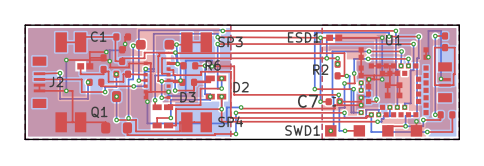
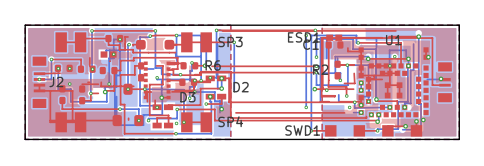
top track: none -> (92, 30) (155, 30)
bottom track: none -> (92, 30) (92, 72)
via: none -> (92, 30)
bottom track: none -> (155, 30) (155, 68) (161, 68) (161, 74) (180, 74)
via: none -> (155, 30)
top track: none -> (216, 30) (315, 30)
bottom track: (216, 30) (138, 30) (138, 80) -> (216, 30) (216, 77) (210, 77)
via: none -> (216, 30)
via: (222, 30) -> none
via: none -> (315, 30)
bottom track: (395, 30) (397, 107) -> none
via: (395, 30) -> none
top track: none -> (176, 35) (150, 36)
via: none -> (176, 35)
bottom track: none -> (306, 35) (306, 107)
via: none -> (306, 35)
top track: (445, 35) (435, 36) -> none
top track: (115, 36) (115, 61) (122, 61) (122, 58) (144, 58) (144, 52) -> (125, 49) (133, 49) (133, 52) (144, 52)
top track: (116, 36) (80, 36) (80, 38) -> (122, 49) (119, 49) (119, 45) (108, 45) (108, 38) (80, 38)
C1 position: (122, 36) -> (334, 44)
via: none -> (150, 36)
bottom track: (389, 36) (389, 32) (314, 32) (314, 89) -> none
via: (389, 36) -> none
bottom track: (435, 36) (435, 114) -> none
via: (435, 36) -> none
bottom track: none -> (150, 37) (140, 37) (140, 105) (157, 105) (157, 107)
top track: (217, 37) (322, 37) -> (321, 88) (322, 37)
bottom track: (217, 37) (217, 33) (153, 33) (153, 71) (144, 71) (144, 86) (133, 86) -> none
via: (217, 37) -> none
via: (320, 37) -> none
bottom track: (382, 37) (382, 79) -> none
via: (382, 37) -> none
part: none -> (114, 38)
via: none -> (120, 39)
part: (445, 41) -> none
top track: none -> (206, 42) (234, 42)
bottom track: none -> (234, 42) (234, 90)
via: none -> (234, 42)
top track: none -> (358, 42) (401, 42) (401, 65)
bottom track: none -> (358, 42) (356, 42) (356, 35) (311, 35) (311, 130)
via: none -> (358, 42)
via: (125, 44) -> none
bottom track: none -> (129, 44) (128, 89)
via: none -> (129, 44)
bottom track: (176, 44) (177, 64) (180, 64) (180, 80) -> none
via: (176, 44) -> none
top track: (217, 44) (413, 44) -> none
via: (217, 44) -> none
top track: none -> (328, 44) (328, 86) (346, 86) (346, 95)
via: (413, 44) -> none
bottom track: (133, 45) (133, 79) (128, 79) (128, 118) -> none
via: (133, 45) -> none
top track: none -> (347, 48) (347, 51) (360, 51)
top track: (369, 51) (401, 51) -> none
bottom track: (369, 51) (332, 51) (333, 130) (330, 130) -> none
via: (369, 51) -> none
bottom track: (401, 51) (401, 65) -> none
via: (401, 51) -> none
top track: (106, 52) (89, 52) (89, 57) (103, 57) -> none
via: (106, 52) -> none
via: (175, 52) -> none
part: none -> (108, 54)
via: none -> (113, 54)
part: (122, 55) -> none
bottom track: none -> (201, 56) (176, 56) (176, 35) (201, 35) (201, 80)
bottom track: none -> (368, 56) (335, 56) (335, 73)
via: none -> (394, 56)
bottom track: none -> (316, 57) (316, 38) (353, 38) (353, 49) (375, 49) (375, 100)
via: none -> (316, 57)
bottom track: none -> (406, 57) (406, 50) (389, 50) (389, 65)
bottom track: (428, 57) (428, 30) (441, 30) (441, 78) -> none
via: (326, 58) -> none
top track: (337, 58) (161, 58) (161, 73) (168, 74) -> none
via: (337, 58) -> none
bottom track: (368, 58) (354, 58) (354, 73) -> none
bottom track: (418, 58) (417, 58) (417, 116) (405, 116) (405, 126) (423, 126) (423, 120) -> (418, 58) (421, 129) (402, 129)
top track: none -> (51, 59) (81, 59) (80, 69)
bottom track: none -> (51, 59) (51, 79) (39, 79)
via: none -> (51, 59)
top track: (66, 60) (110, 60) (110, 67) (129, 67) (129, 63) (150, 63) -> none
bottom track: (66, 60) (66, 90) -> none
via: (66, 60) -> none
via: (109, 61) -> none
bottom track: none -> (191, 62) (190, 80) (194, 80)
via: none -> (191, 62)
part footprint: [77, 63, 94, 70] -> [77, 65, 96, 73]
part: (103, 63) -> none
top track: (145, 63) (150, 63) (150, 92) -> none
via: (177, 64) -> none
via: (337, 64) -> none
top track: none -> (340, 64) (354, 65) (347, 65) (340, 64)
top track: none -> (141, 65) (134, 65) (134, 74) (120, 74) (120, 104) (124, 104) (124, 133) (175, 133)
bottom track: (205, 65) (205, 94) (210, 94) (210, 96) -> none
bottom track: none -> (347, 65) (368, 65) (368, 101)
bottom track: none -> (347, 65) (347, 85) (316, 85) (316, 72)
via: none -> (347, 65)
via: none -> (389, 65)
via: (401, 65) -> none
bottom track: none -> (407, 65) (407, 101) (398, 101) (398, 129) (377, 129) (377, 130)
top track: (80, 66) (80, 74) (103, 74) (103, 69) (103, 71) (108, 71) (108, 81) (123, 81) (123, 74) (145, 74) -> none
bottom track: (211, 66) (211, 60) (185, 60) (185, 96) (168, 96) (168, 91) -> none
via: (211, 66) -> none
top track: (234, 66) (234, 94) (338, 94) -> (234, 66) (316, 66)
bottom track: none -> (316, 66) (321, 66) (321, 73) (340, 73) (340, 80)
via: none -> (316, 66)
bottom track: none -> (58, 68) (58, 89) (70, 89) (70, 101) (106, 101) (106, 90)
via: none -> (58, 68)
part: none -> (63, 68)
via: none -> (69, 68)
via: (145, 68) -> none
top track: none -> (171, 68) (177, 69) (177, 57) (133, 57) (133, 60) (120, 60) (120, 70) (114, 70) (114, 90) (106, 90)
via: none -> (92, 69)
part: none -> (108, 70)
part: none -> (141, 71)
bottom track: none -> (92, 72) (90, 93)
top track: none -> (316, 72) (199, 72) (199, 74) (194, 74)
via: none -> (316, 72)
bottom track: (60, 73) (60, 98) (88, 98) (88, 82) -> none
via: (60, 73) -> none
via: (354, 73) -> none
via: (116, 74) -> none
part: (122, 74) -> none
via: none -> (180, 74)
top track: (346, 76) (337, 75) (344, 76) (344, 53) (159, 53) (158, 81) (182, 81) (182, 82) (173, 82) (173, 81) -> none
bottom track: (346, 76) (349, 76) (349, 89) (351, 89) (351, 112) (353, 112) (353, 89) -> none
via: (346, 76) -> none
bottom track: none -> (157, 77) (157, 79) (194, 79) (194, 86) (189, 86) (189, 98)
via: none -> (157, 77)
via: none -> (210, 77)
top track: none -> (221, 78) (229, 78) (229, 102) (354, 102)
top track: (39, 79) (81, 79) (81, 92) (105, 92) -> none
via: none -> (39, 79)
via: (369, 79) -> none
via: (382, 79) -> none
bottom track: none -> (427, 79) (441, 79)
via: (138, 80) -> none
via: (180, 80) -> none
via: none -> (194, 80)
via: none -> (201, 80)
via: none -> (340, 80)
via: (161, 81) -> none
via: (88, 82) -> none
part: (95, 82) -> none
bottom track: (344, 83) (344, 107) (339, 107) (339, 130) (345, 130) -> none
via: (344, 83) -> none
via: none -> (69, 84)
top track: none -> (82, 84) (98, 84)
bottom track: none -> (109, 84) (109, 58) (113, 58) (113, 39) (120, 39) (120, 75) (114, 75) (114, 125) (143, 125) (143, 114) (162, 114) (162, 94)
via: none -> (109, 84)
top track: (434, 85) (434, 47) (454, 47) (453, 85) (445, 85) -> (434, 85) (432, 85) (432, 38) (321, 38) (321, 96) (334, 95) (321, 95)
via: (133, 86) -> none
via: none -> (128, 89)
top track: none -> (144, 89) (128, 89)
bottom track: none -> (144, 89) (183, 89) (183, 122)
via: none -> (144, 89)
via: (353, 89) -> none
top track: none -> (50, 90) (50, 122) (61, 122)
via: (66, 90) -> none
bottom track: (175, 90) (175, 75) (155, 75) (155, 100) -> none
via: (175, 90) -> none
via: none -> (326, 90)
top track: (145, 91) (168, 91) -> (171, 91) (194, 91)
via: (168, 91) -> none
bottom track: none -> (194, 92) (214, 92) (214, 101) (219, 101) (219, 112)
via: none -> (194, 92)
via: none -> (90, 93)
top track: none -> (98, 93) (90, 93) (90, 100) (82, 100)
part: none -> (62, 94)
part: none -> (82, 94)
via: (338, 94) -> none
via: (116, 96) -> none
via: (221, 96) -> none
via: none -> (346, 96)
via: (361, 97) -> none
via: none -> (189, 98)
bottom track: (210, 99) (170, 99) (170, 118) -> (210, 99) (211, 133) (175, 133)
top track: (376, 99) (376, 101) (368, 101) -> none
top track: none -> (62, 100) (62, 109) (120, 109)
via: (155, 100) -> none
top track: none -> (375, 100) (397, 101) (397, 107)
bottom track: (147, 101) (147, 123) (226, 123) (226, 107) (241, 107) -> none
via: (147, 101) -> none
via: (320, 101) -> none
C7: (334, 101) -> none
via: (339, 101) -> none
via: none -> (368, 101)
via: none -> (354, 102)
part: none -> (128, 104)
via: none -> (206, 104)
top track: (221, 104) (221, 121) (377, 121) -> (221, 104) (206, 104)
top track: (361, 105) (334, 105) (334, 108) (241, 107) -> none
via: none -> (157, 107)
via: (241, 107) -> none
via: none -> (306, 107)
via: none -> (349, 107)
bottom track: (389, 107) (389, 116) (383, 116) (381, 121) (377, 121) -> (389, 107) (354, 108) (354, 102)
via: (397, 107) -> none
bottom track: none -> (120, 109) (138, 109) (138, 120)
via: none -> (120, 109)
top track: none -> (177, 109) (214, 109) (214, 120) (378, 120)
bottom track: none -> (177, 109) (177, 118) (148, 118) (148, 120)
via: none -> (177, 109)
top track: (221, 109) (175, 109) (175, 125) (168, 125) -> (156, 65) (162, 65) (162, 84) (149, 84) (149, 115) (168, 115) (168, 125)
Q1: (116, 112) -> none
bottom track: (235, 112) (235, 134) -> (206, 42) (206, 63)
via: (235, 112) -> none
bottom track: (344, 112) (344, 117) (366, 117) (366, 109) (378, 109) (378, 114) -> (378, 120) (378, 114)
via: (344, 112) -> none
top track: (371, 114) (366, 116) (371, 116) (371, 114) -> none
bottom track: (371, 114) (371, 132) (427, 132) -> none
top track: (435, 114) (440, 114) (440, 120) (423, 120) -> none
via: (435, 114) -> none
part: (446, 114) -> none
top track: (452, 114) (452, 132) (427, 132) -> none
via: (128, 118) -> none
via: (170, 118) -> none
top track: none -> (50, 120) (117, 120)
top track: (116, 120) (136, 120) (136, 131) (179, 131) (179, 122) (183, 122) -> none
via: (116, 120) -> none
via: none -> (138, 120)
via: none -> (148, 120)
top track: (80, 122) (105, 122) (105, 127) -> none
via: none -> (183, 122)
via: none -> (176, 123)
top track: (127, 127) (127, 135) (235, 134) -> none
top track: none -> (311, 130) (330, 130)
via: none -> (311, 130)
via: (330, 130) -> none
top track: (345, 130) (359, 130) -> (377, 130) (359, 130)
via: (345, 130) -> none
via: none -> (377, 130)
via: (427, 132) -> none
via: none -> (175, 133)
via: (235, 134) -> none

